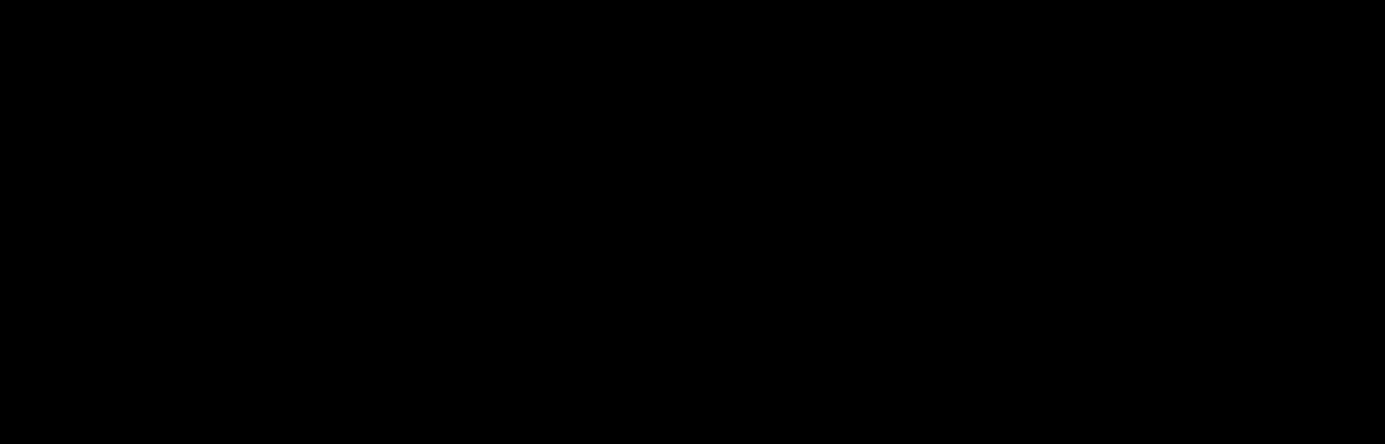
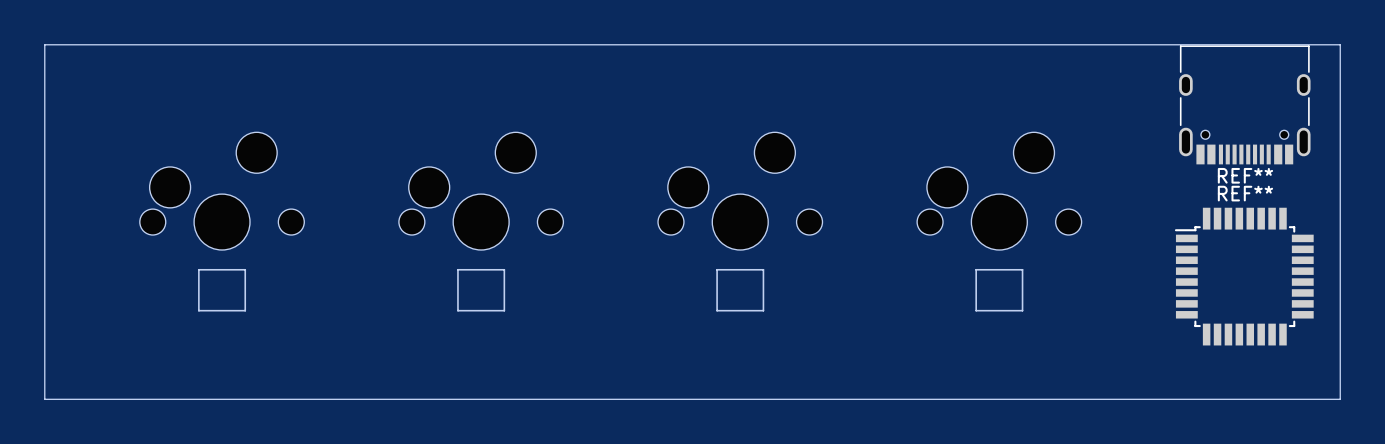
board edge: none -> (44, 44) (44, 399) (1340, 399) (1340, 44) (44, 44)
REF**: none -> (1244, 104)
part: none -> (222, 191)
part: none -> (481, 191)
part: none -> (740, 191)
part: none -> (999, 191)
REF**: none -> (1244, 276)
part: none -> (222, 290)
part: none -> (481, 290)
part: none -> (740, 290)
part: none -> (999, 290)

